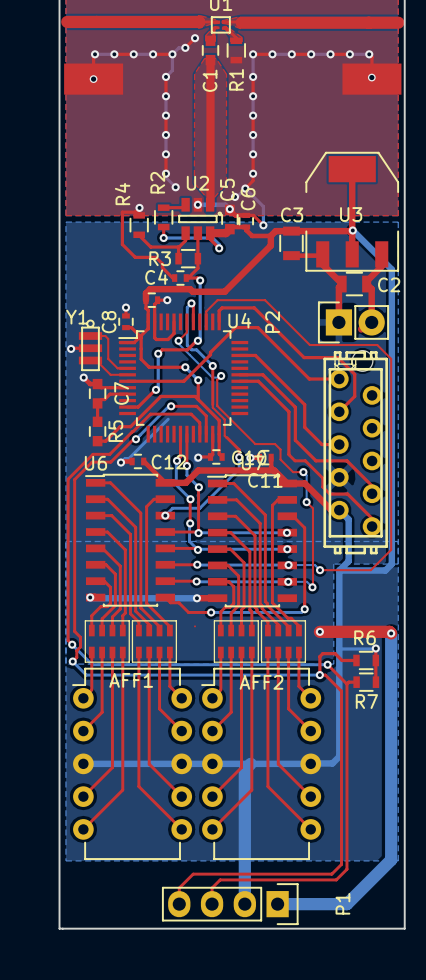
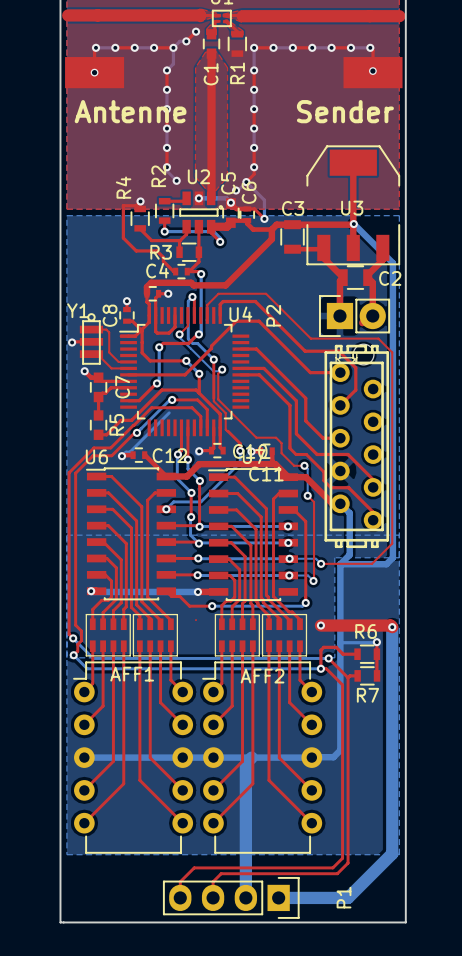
text: none -> Antenne (130, 111)
text: none -> Sender (345, 111)

